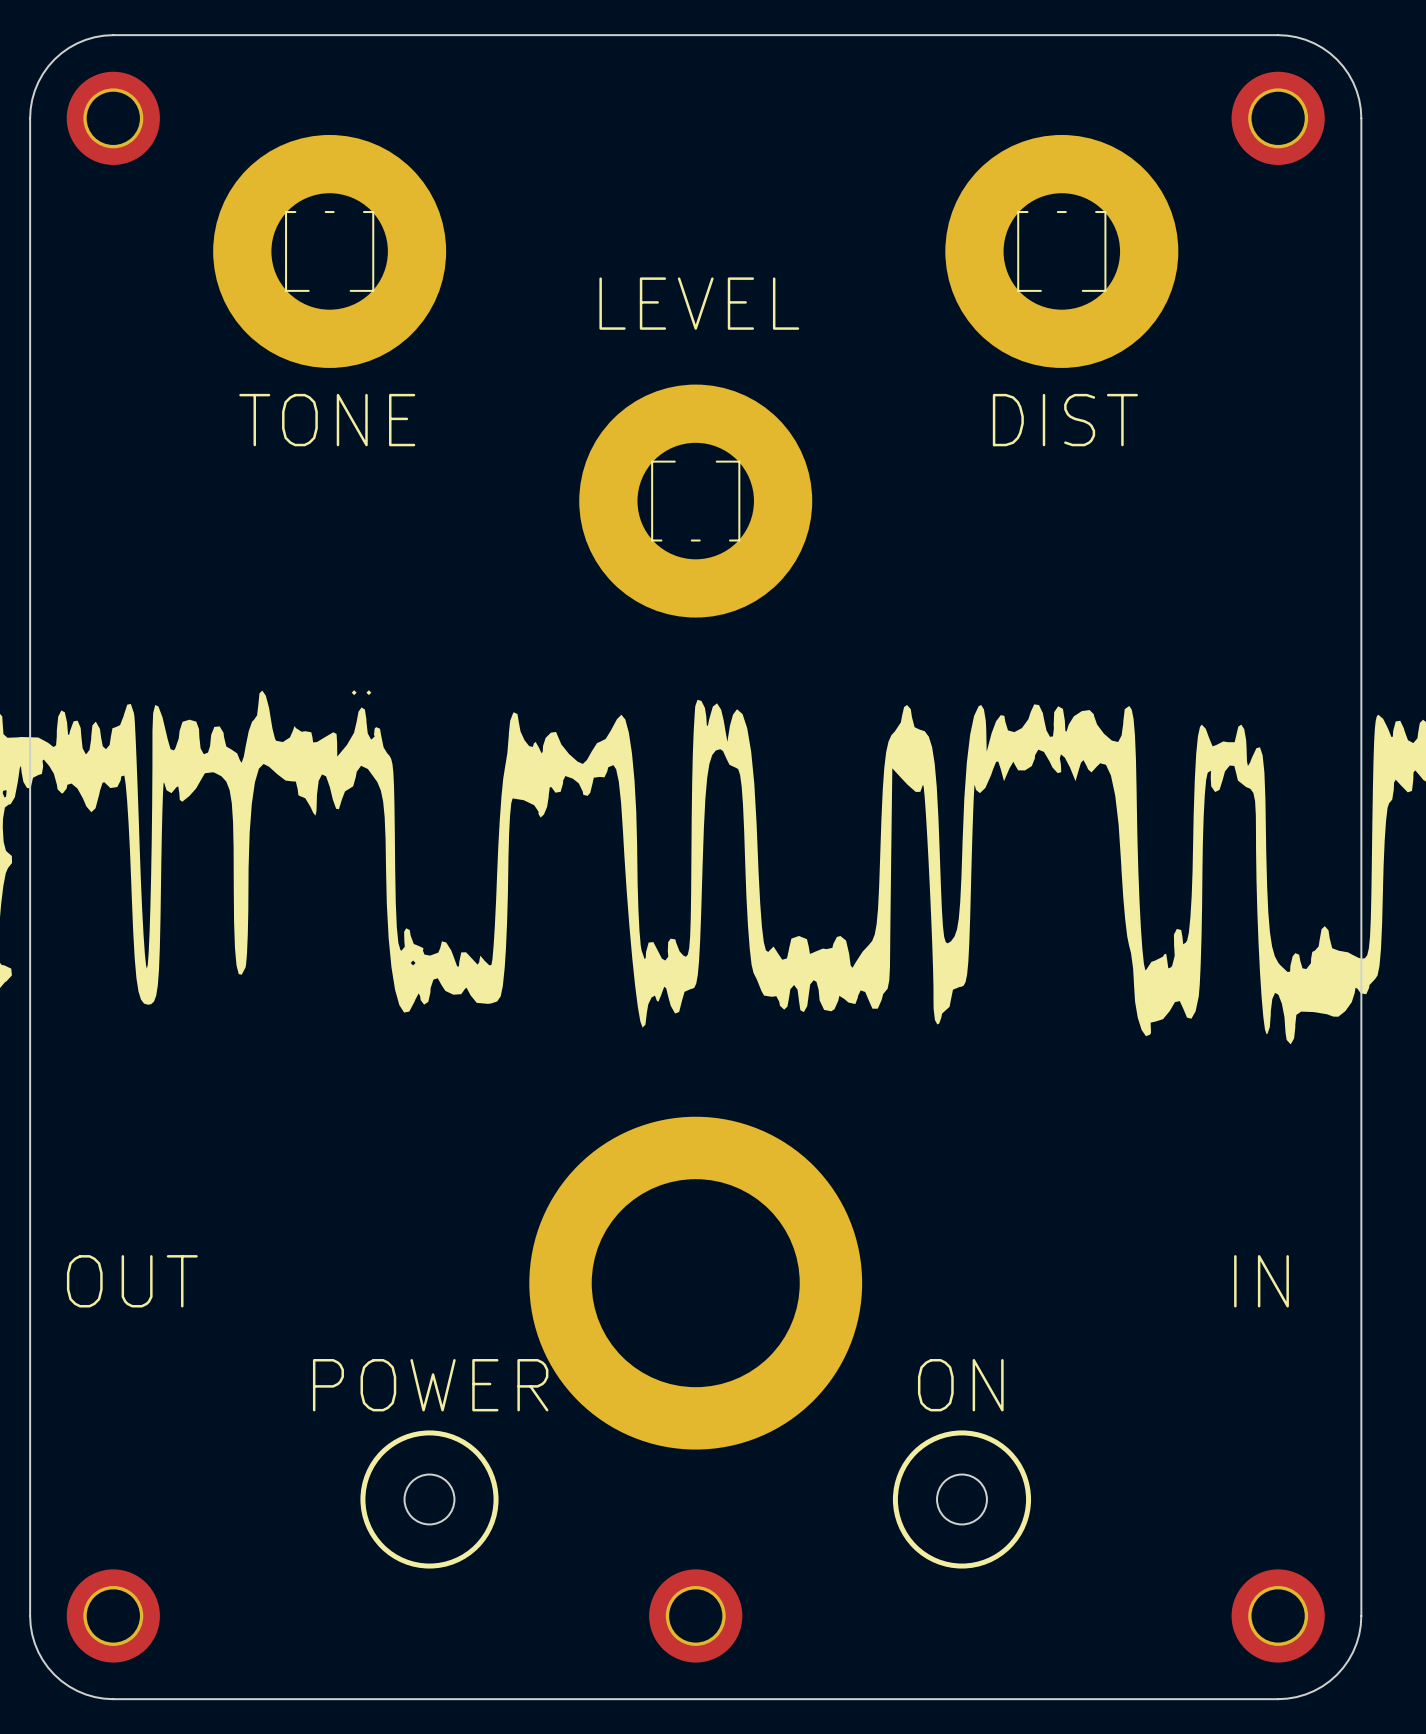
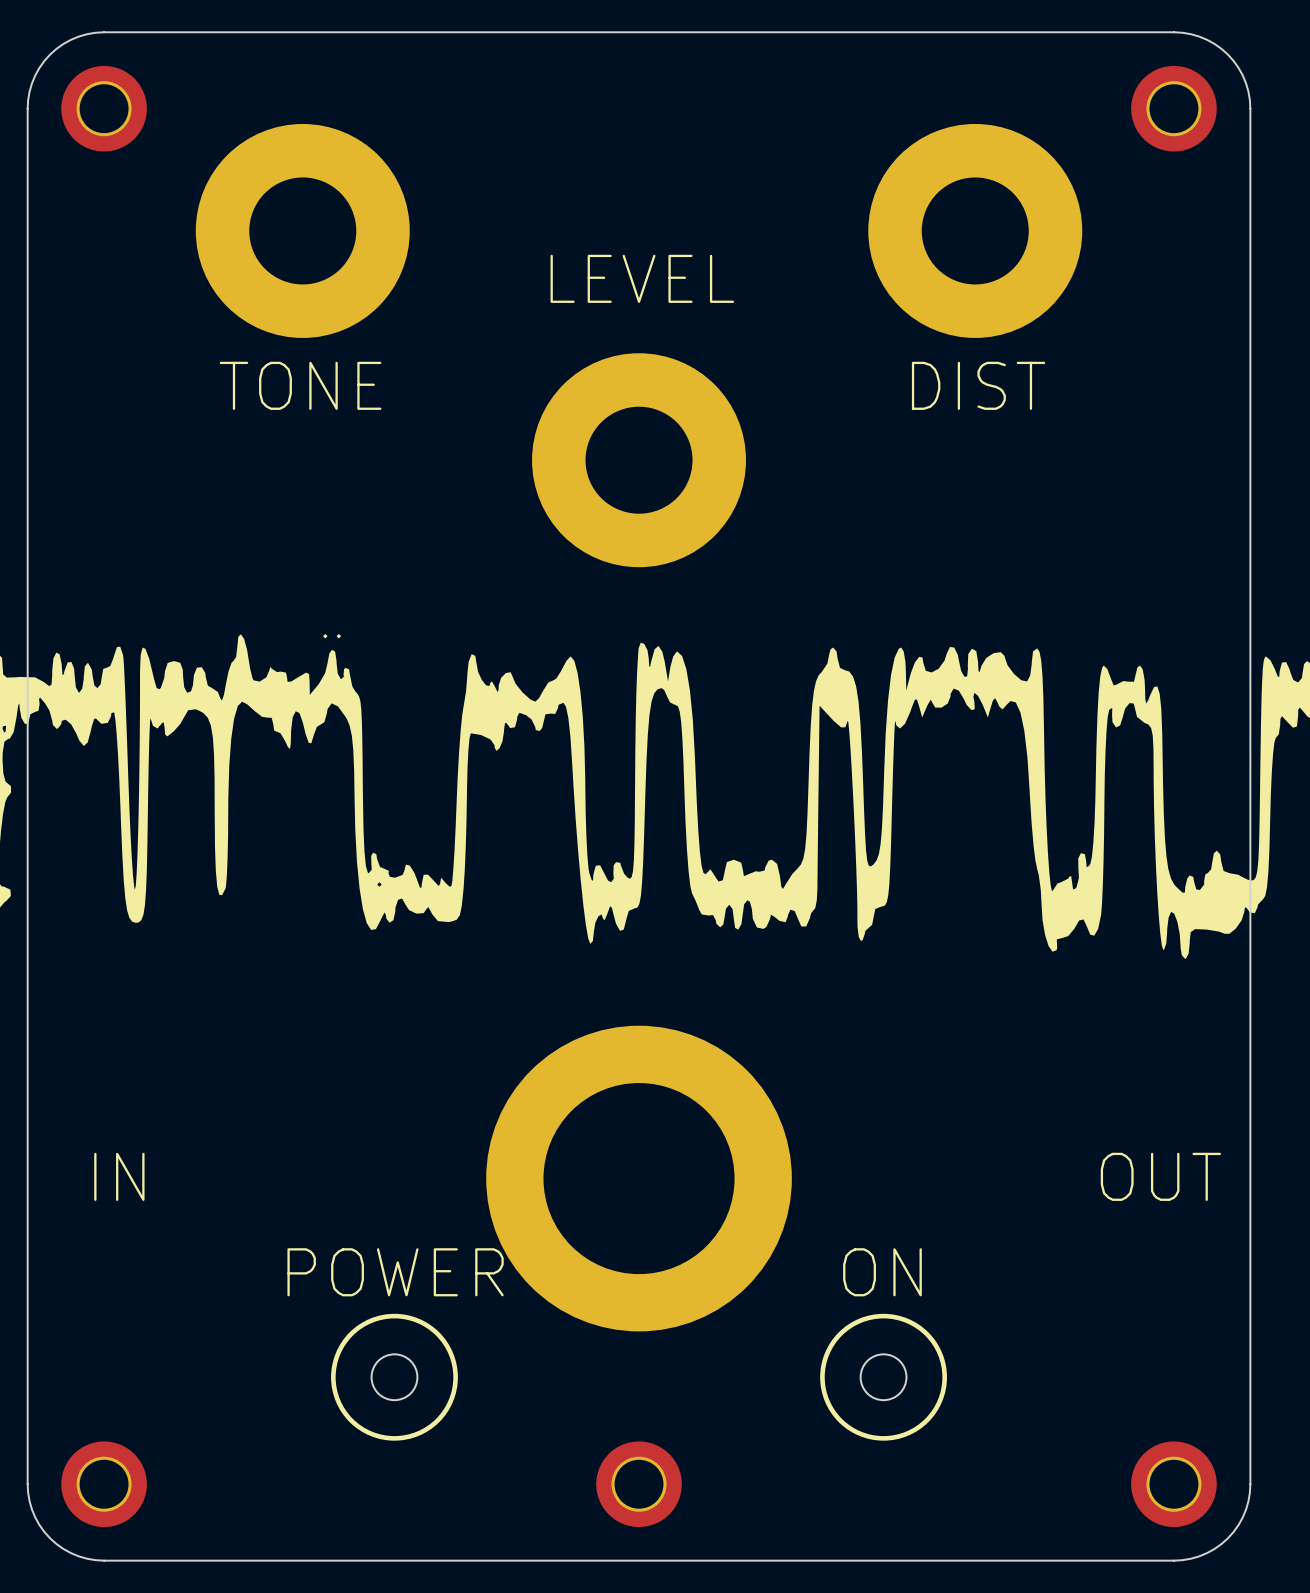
part footprint: [213, 134, 447, 368] -> [195, 123, 410, 338]
part footprint: [945, 134, 1179, 368] -> [868, 123, 1083, 338]
part footprint: [579, 384, 813, 618] -> [532, 353, 747, 568]
text: OUT (132, 1281) -> IN (119, 1176)
text: IN (1261, 1281) -> OUT (1160, 1176)

